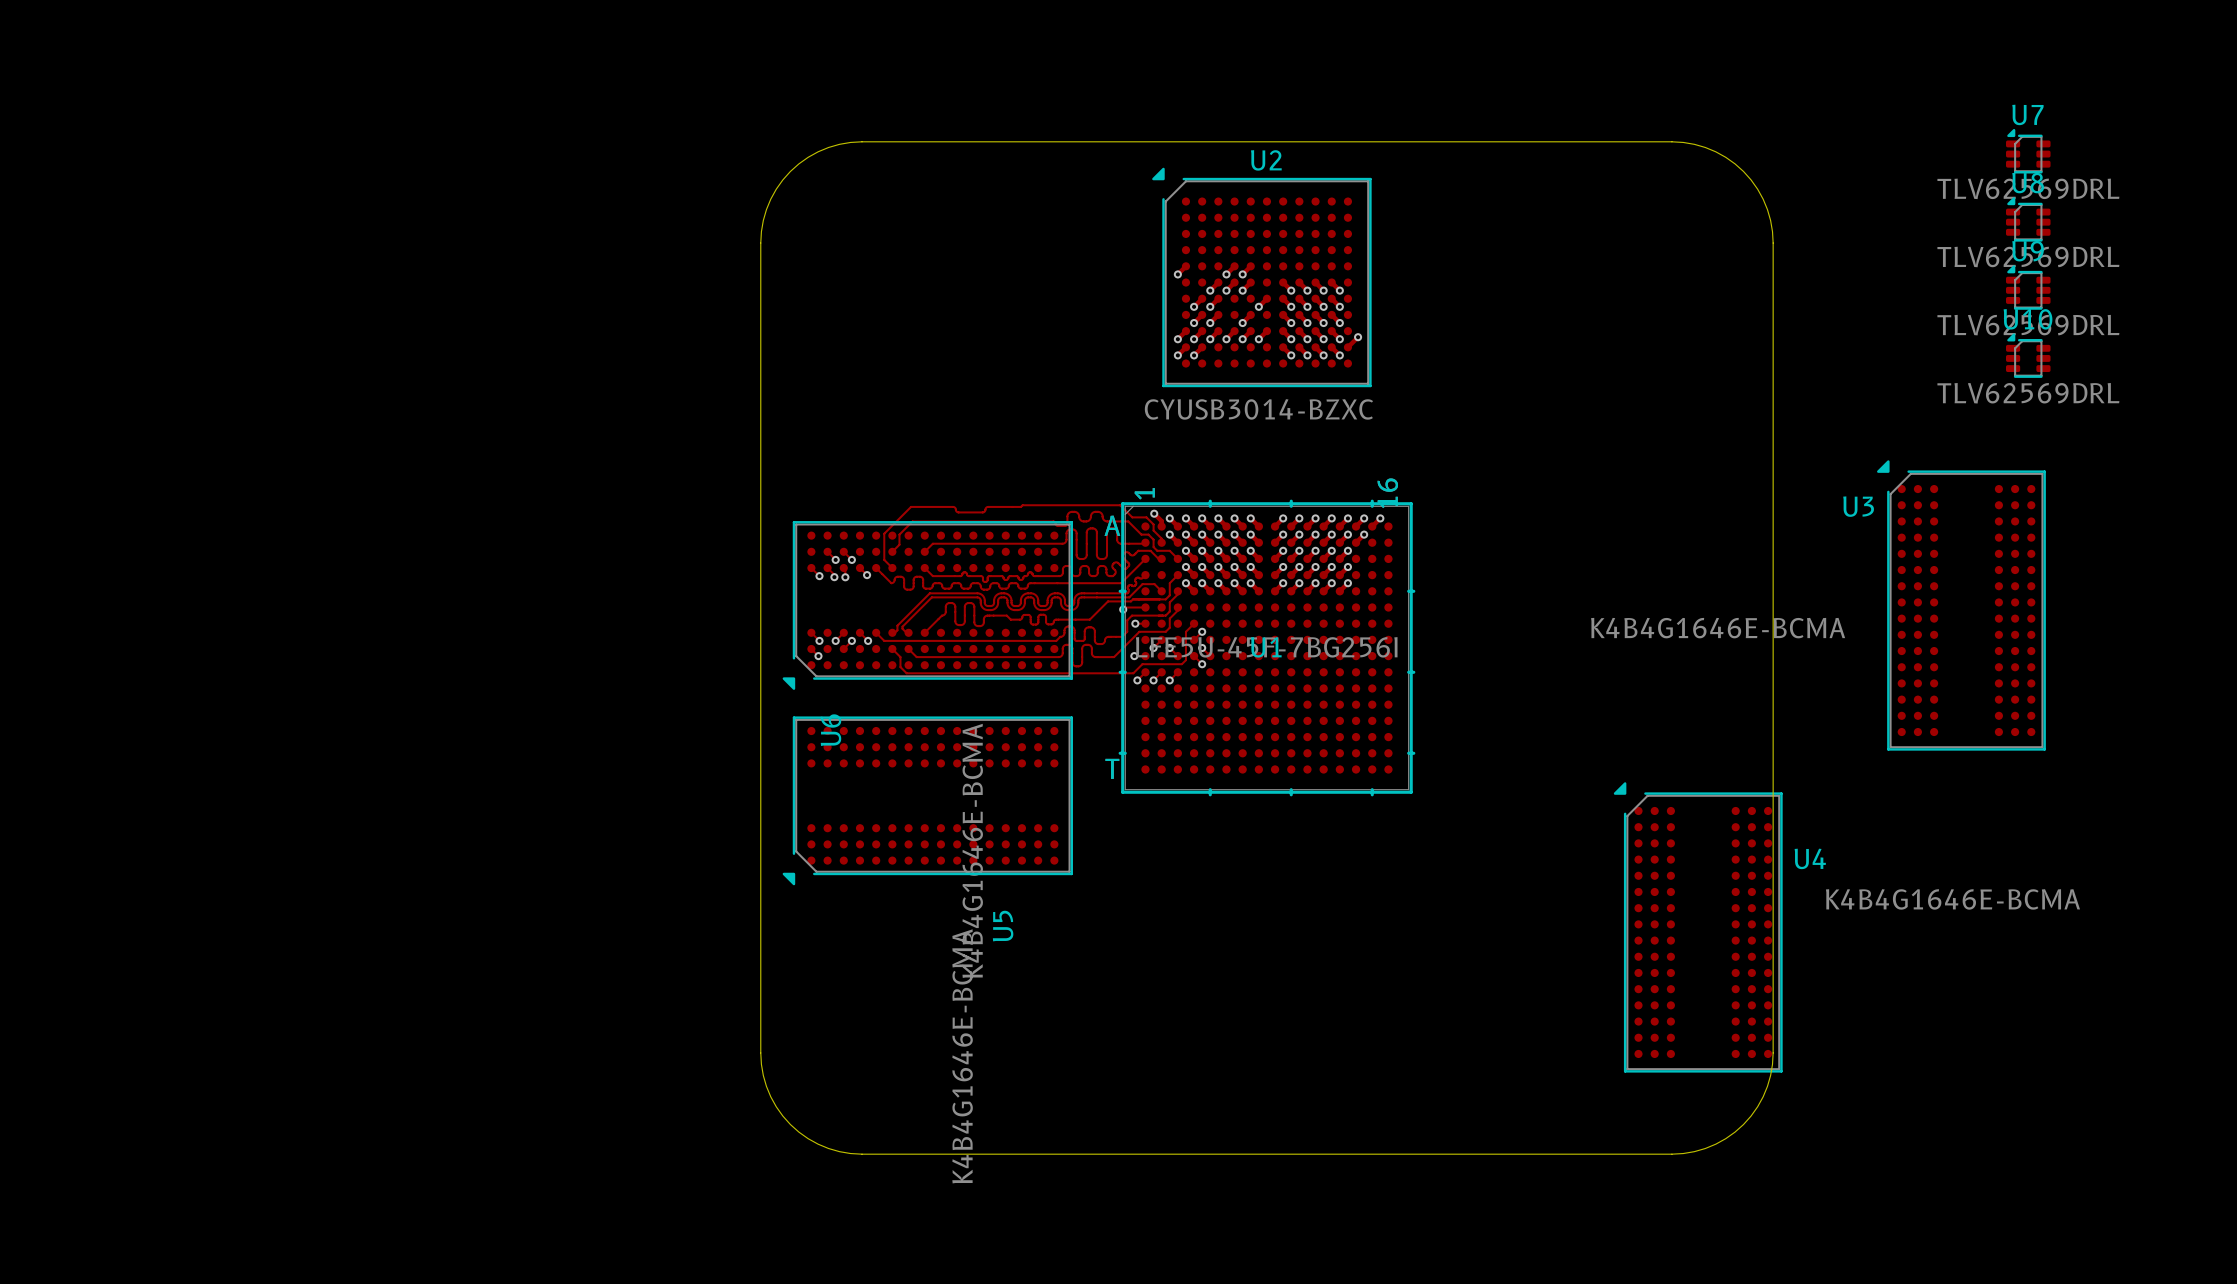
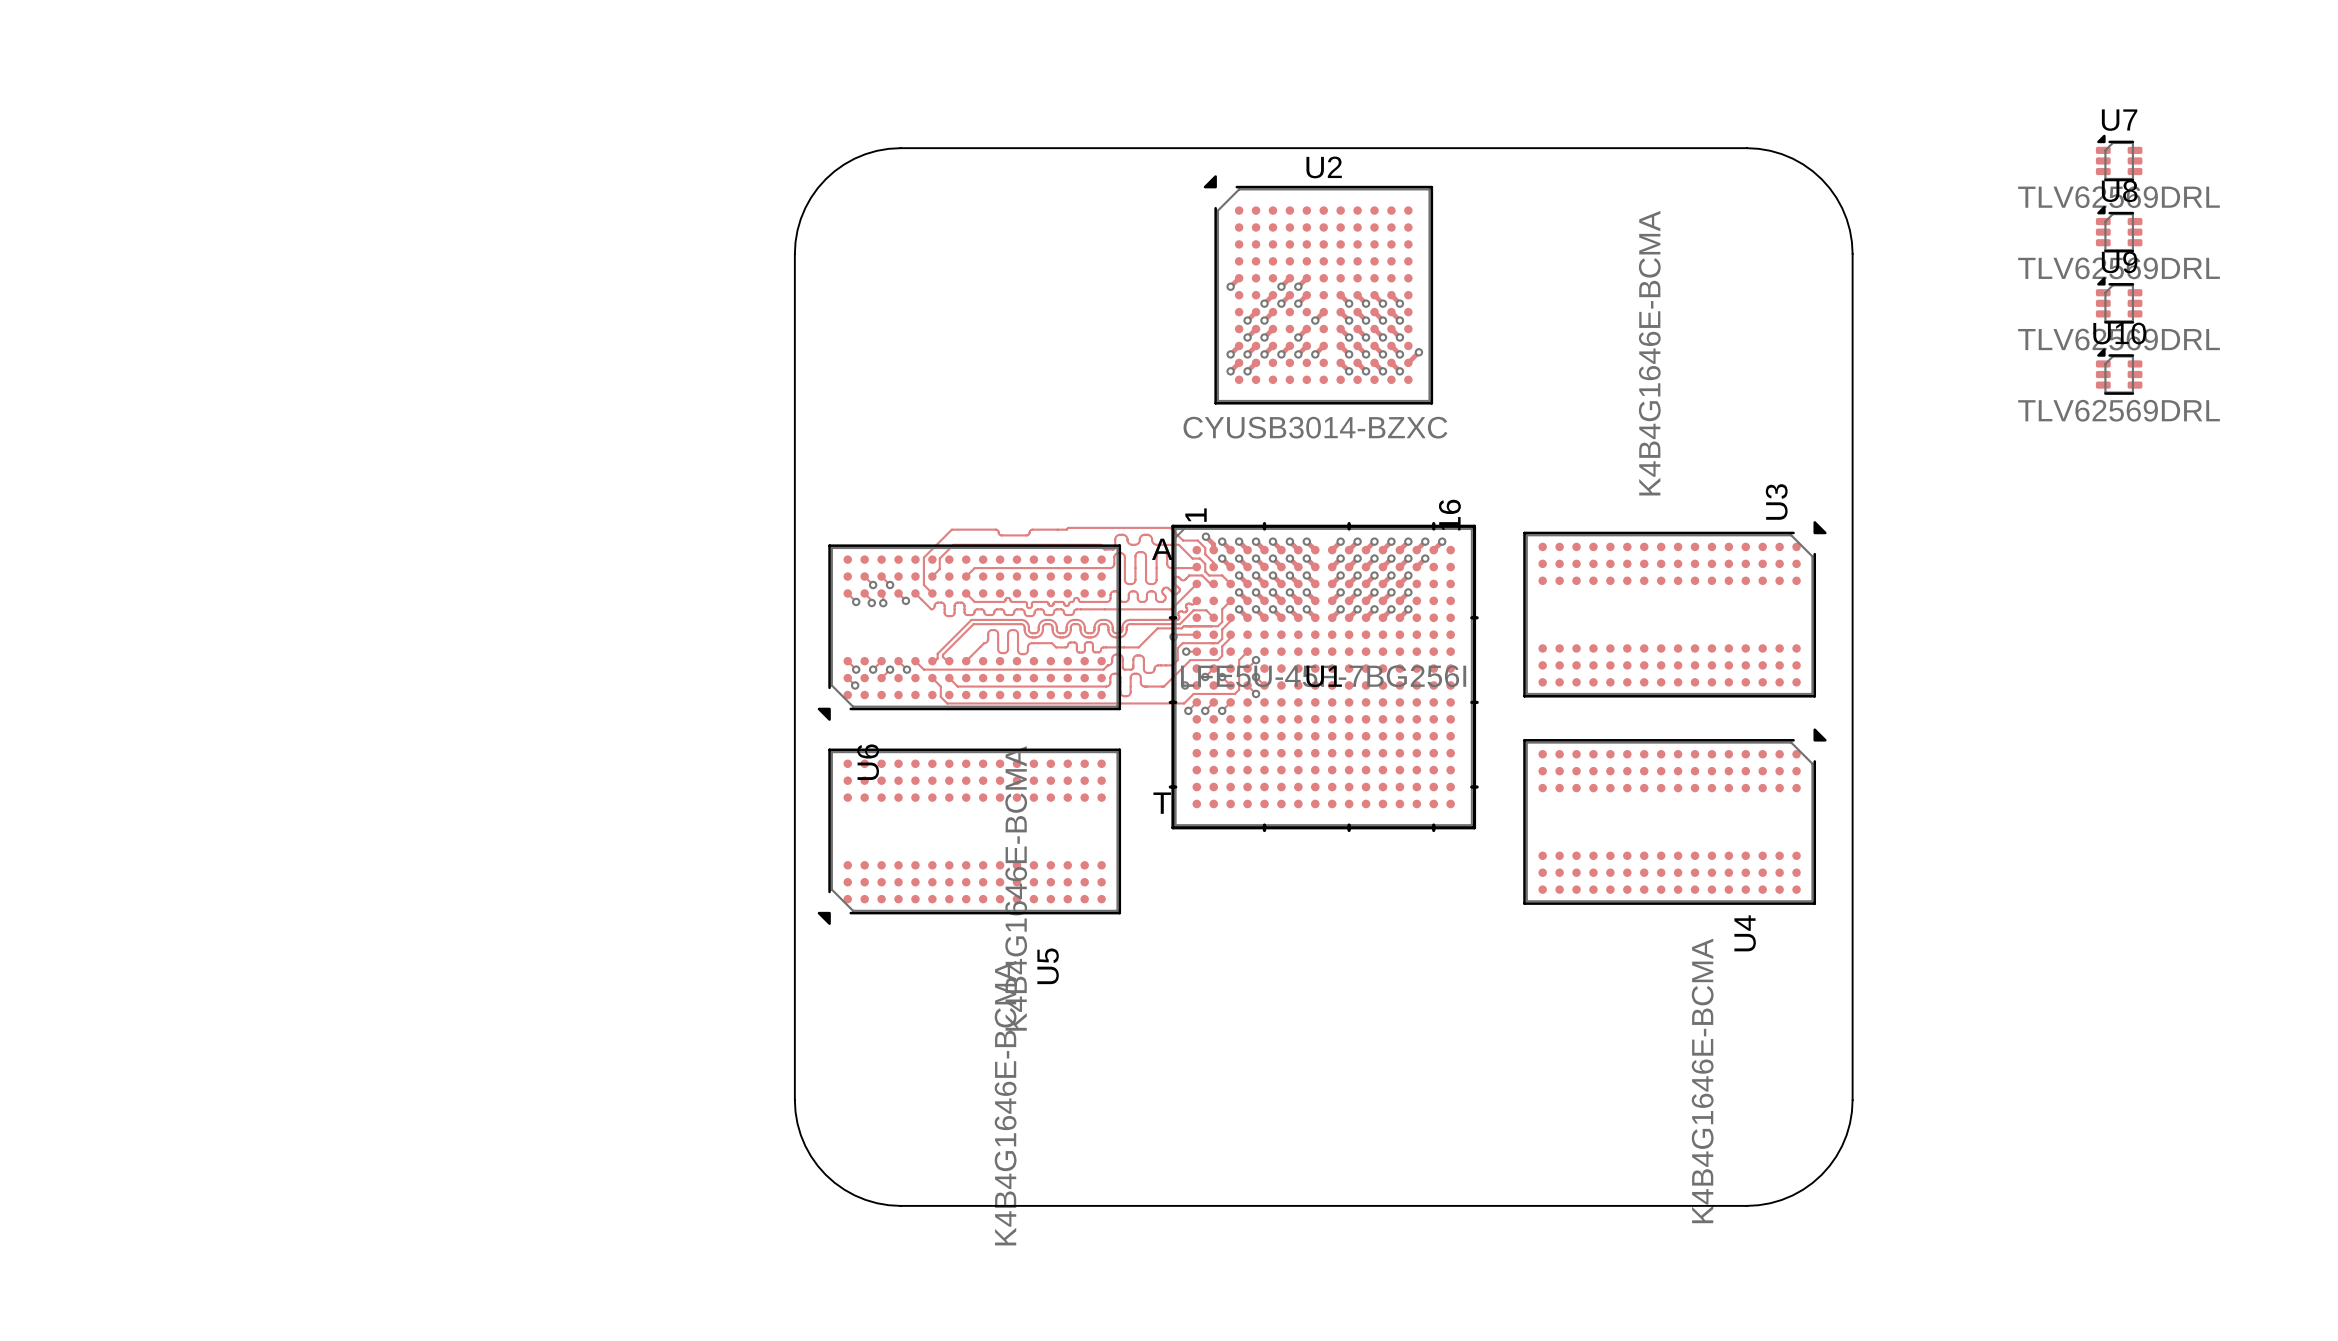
U3 rotation: 0° (1961, 605) -> 90° clockwise (1674, 609)
U3 position: (1961, 605) -> (1674, 609)
U4 rotation: 0° (1698, 927) -> 90° clockwise (1674, 816)

